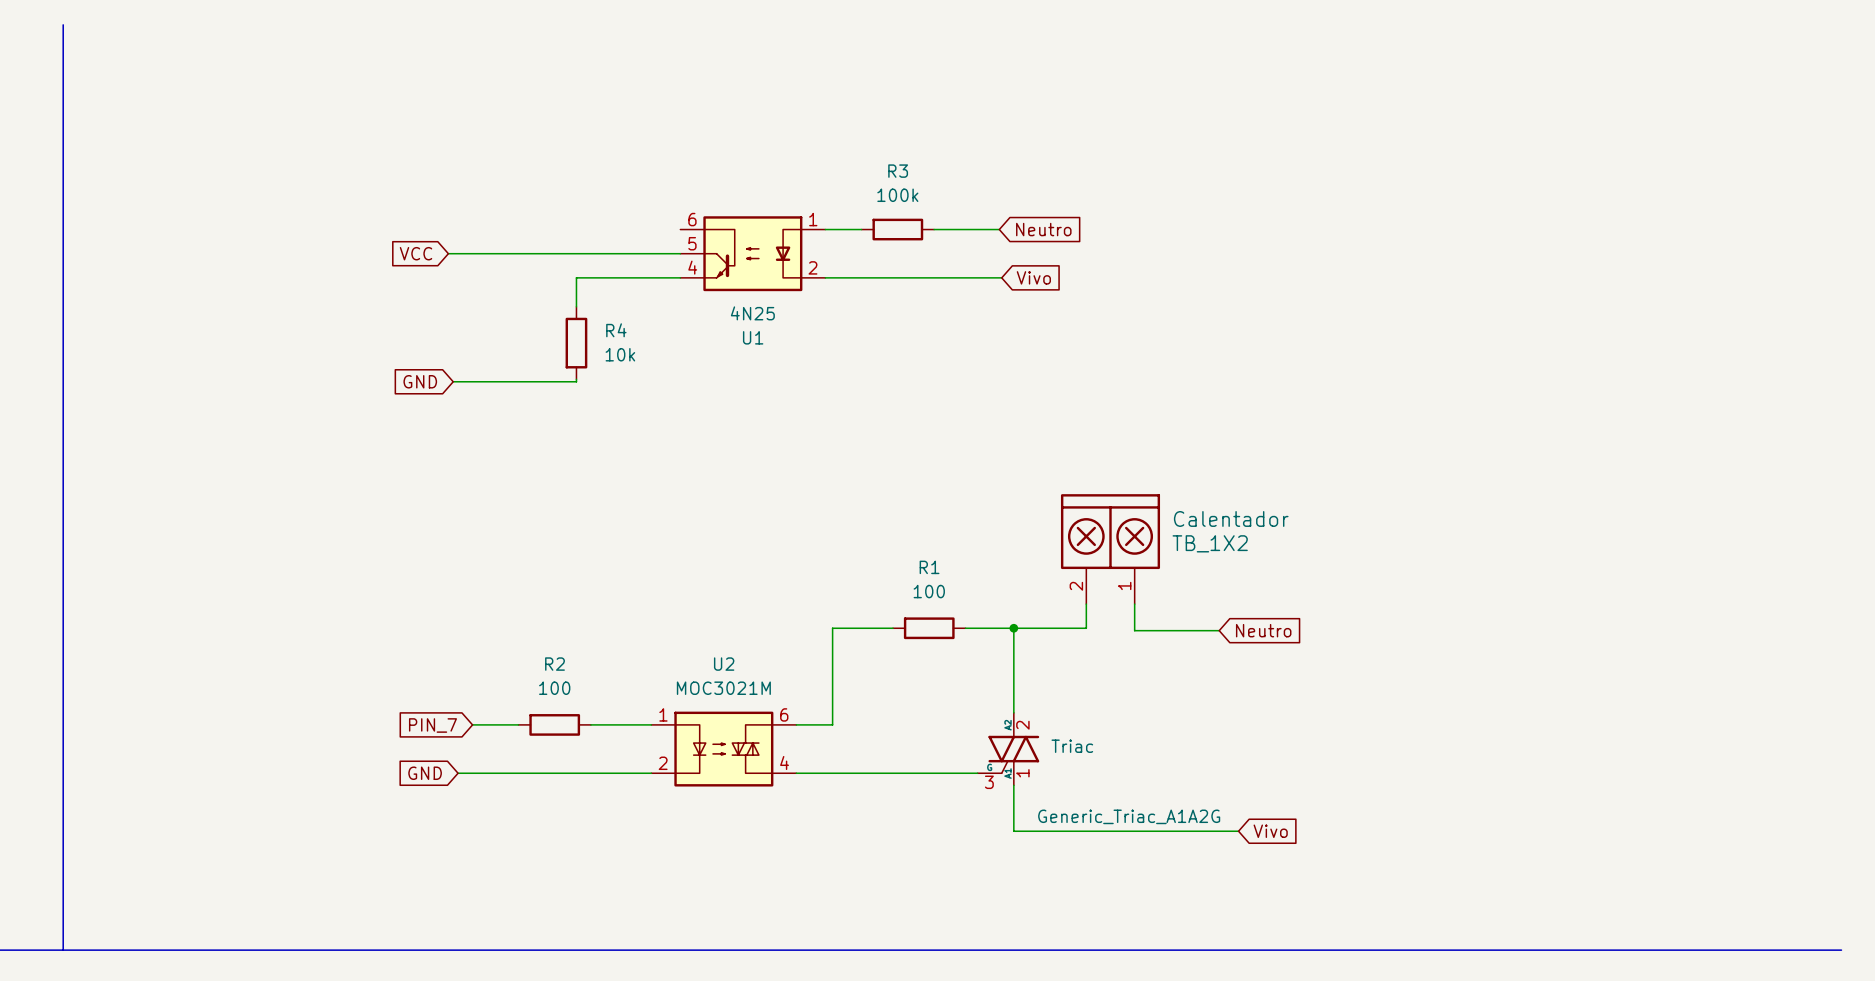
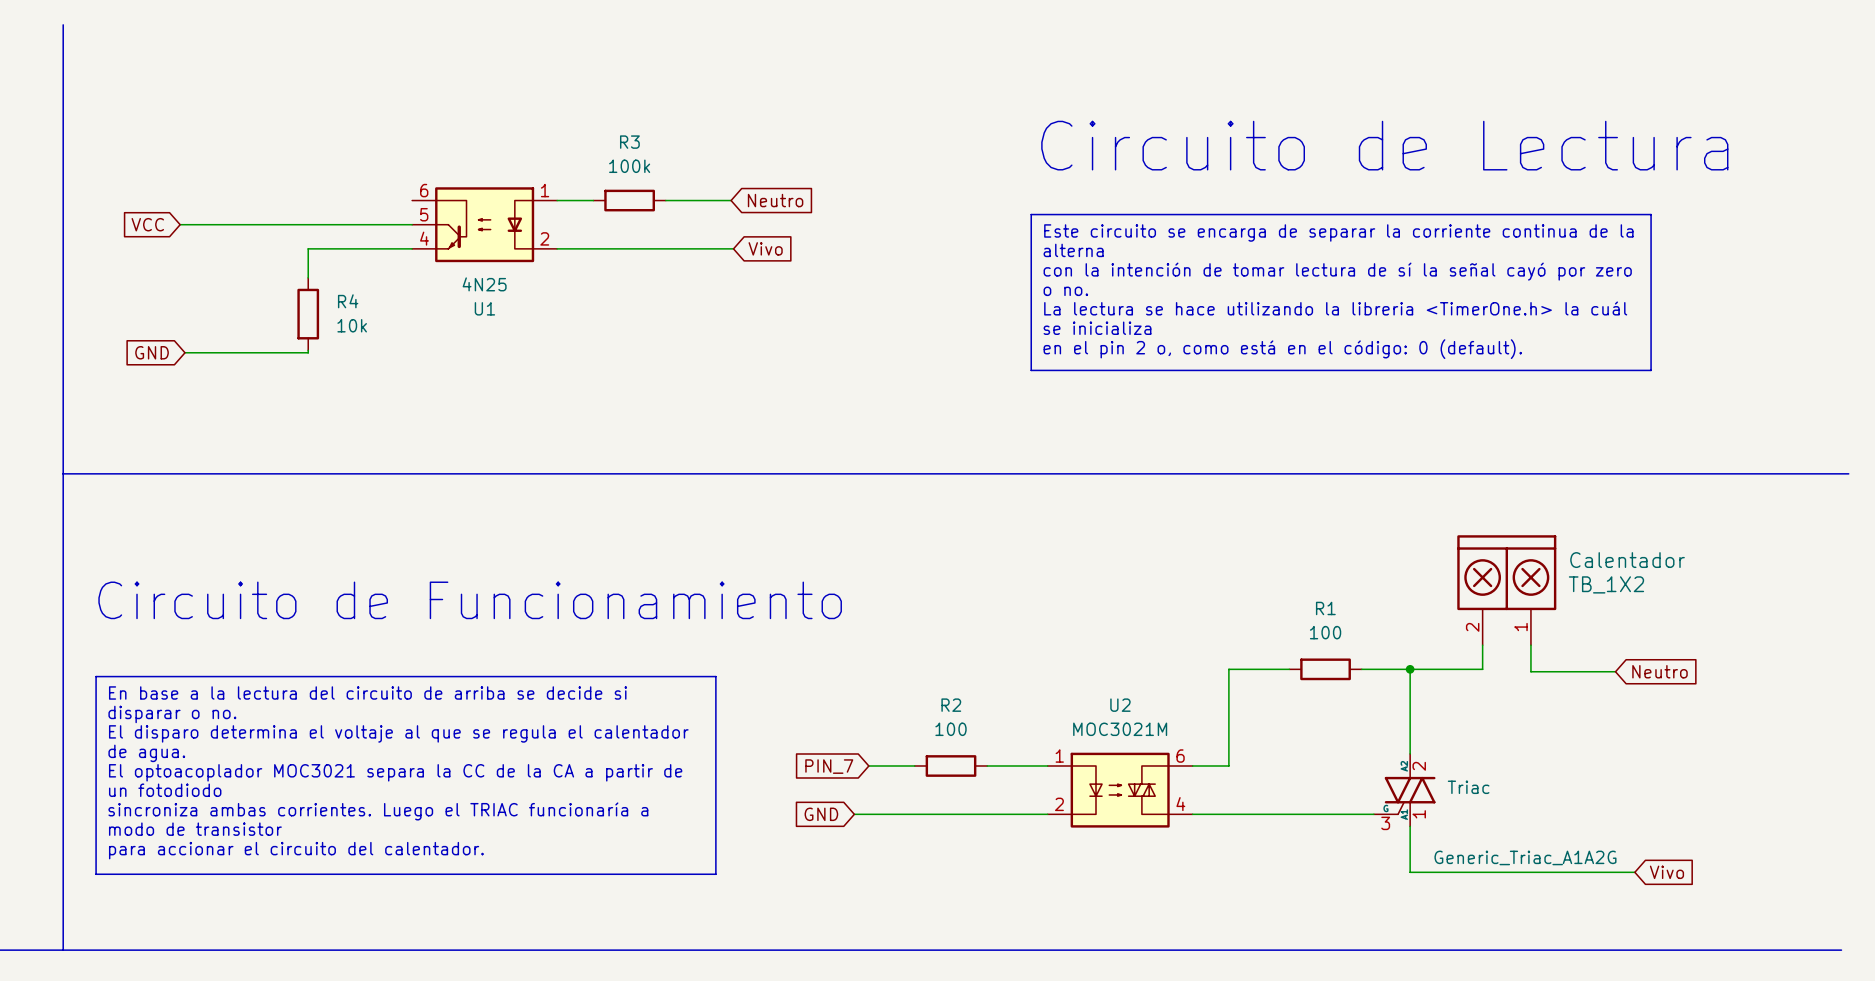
text: none -> Circuito de Lectura (1384, 145)
wire: none -> (557, 200) (593, 200)
wire: none -> (665, 200) (731, 200)
global label: none -> Neutro (775, 200)
line: none -> (1031, 214) (1651, 214) (1651, 370) (1031, 370) (1031, 214)
global label: none -> VCC (147, 224)
wire: none -> (180, 224) (412, 224)
wire: (825, 229) (861, 229) -> none
R3 position: (897, 229) -> (629, 200)
wire: (934, 229) (999, 229) -> none
global label: Neutro (1043, 229) -> none
text: none -> Este circuito se encarga de separar la corriente continua de la (1338, 232)
wire: none -> (412, 248) (308, 248) (308, 277)
wire: none -> (557, 248) (733, 248)
global label: none -> Vivo (765, 248)
text: none -> alterna (1073, 250)
global label: VCC (416, 253) -> none
wire: (448, 253) (680, 253) -> none
U1 position: (752, 253) -> (484, 224)
text: none -> con la intención de tomar lectura de sí la señal cayó por zero (1337, 271)
wire: (680, 277) (576, 277) (576, 306) -> none
wire: (825, 277) (1001, 277) -> none
global label: Vivo (1033, 277) -> none
text: none -> o no. (1065, 291)
text: none -> La lectura se hace utilizando la libreria <TimerOne.h> la cuál (1335, 308)
text: none -> se inicializa (1097, 328)
R4 position: (576, 343) -> (308, 314)
text: none -> en el pin 2 o, como está en el código: 0 (default). (1282, 349)
wire: none -> (308, 350) (308, 352) (184, 352)
global label: none -> GND (152, 352)
wire: (576, 379) (576, 381) (453, 381) -> none
global label: GND (420, 381) -> none
line: none -> (62, 473) (1848, 473)
Calentador: TB_1X2 (1110, 549) -> none
Calentador: none -> TB_1X2 (1506, 590)
text: none -> Circuito de Funcionamiento (470, 600)
wire: (1086, 604) (1086, 628) (965, 628) -> none
wire: (1134, 604) (1134, 630) (1219, 630) -> none
wire: (893, 628) (832, 628) (832, 724) (796, 724) -> none
R1 position: (929, 628) -> (1325, 669)
wire: (1013, 628) (1013, 712) -> none
junction: (1013, 628) -> none
global label: Neutro (1263, 630) -> none
wire: none -> (1482, 645) (1482, 669) (1361, 669)
wire: none -> (1530, 645) (1530, 671) (1615, 671)
wire: none -> (1289, 669) (1228, 669) (1228, 765) (1192, 765)
wire: none -> (1410, 669) (1410, 753)
junction: none -> (1410, 669)
global label: none -> Neutro (1660, 671)
line: none -> (96, 676) (715, 676) (715, 874) (96, 874) (96, 676)
text: none -> En base a la lectura del circuito de arriba se decide si (368, 692)
text: none -> disparar o no. (172, 714)
wire: (472, 724) (518, 724) -> none
R2 position: (554, 724) -> (951, 765)
wire: (590, 724) (651, 724) -> none
global label: PIN_7 (432, 725) -> none
text: none -> El disparo determina el voltaje al que se regula el calentador (398, 733)
U2 position: (723, 749) -> (1120, 790)
Triac: Generic_Triac_A1A2G (1008, 749) -> none
text: none -> de agua. (146, 753)
wire: none -> (868, 765) (914, 765)
wire: none -> (987, 765) (1047, 765)
global label: none -> PIN_7 (829, 766)
text: none -> El optoacoplador MOC3021 separa la CC de la CA a partir de (395, 772)
global label: GND (425, 773) -> none
wire: (458, 773) (651, 773) -> none
wire: (796, 773) (977, 773) -> none
wire: (1013, 785) (1013, 831) (1238, 831) -> none
text: none -> un fotodiodo (165, 790)
Triac: none -> Generic_Triac_A1A2G (1404, 790)
text: none -> sincroniza ambas corrientes. Luego el TRIAC funcionaría a (378, 811)
global label: none -> GND (821, 814)
wire: none -> (854, 814) (1047, 814)
wire: none -> (1192, 814) (1373, 814)
wire: none -> (1410, 826) (1410, 872) (1634, 872)
text: none -> modo de transistor (195, 829)
global label: Vivo (1270, 831) -> none
text: none -> para accionar el circuito del calentador. (296, 850)
global label: none -> Vivo (1666, 872)

